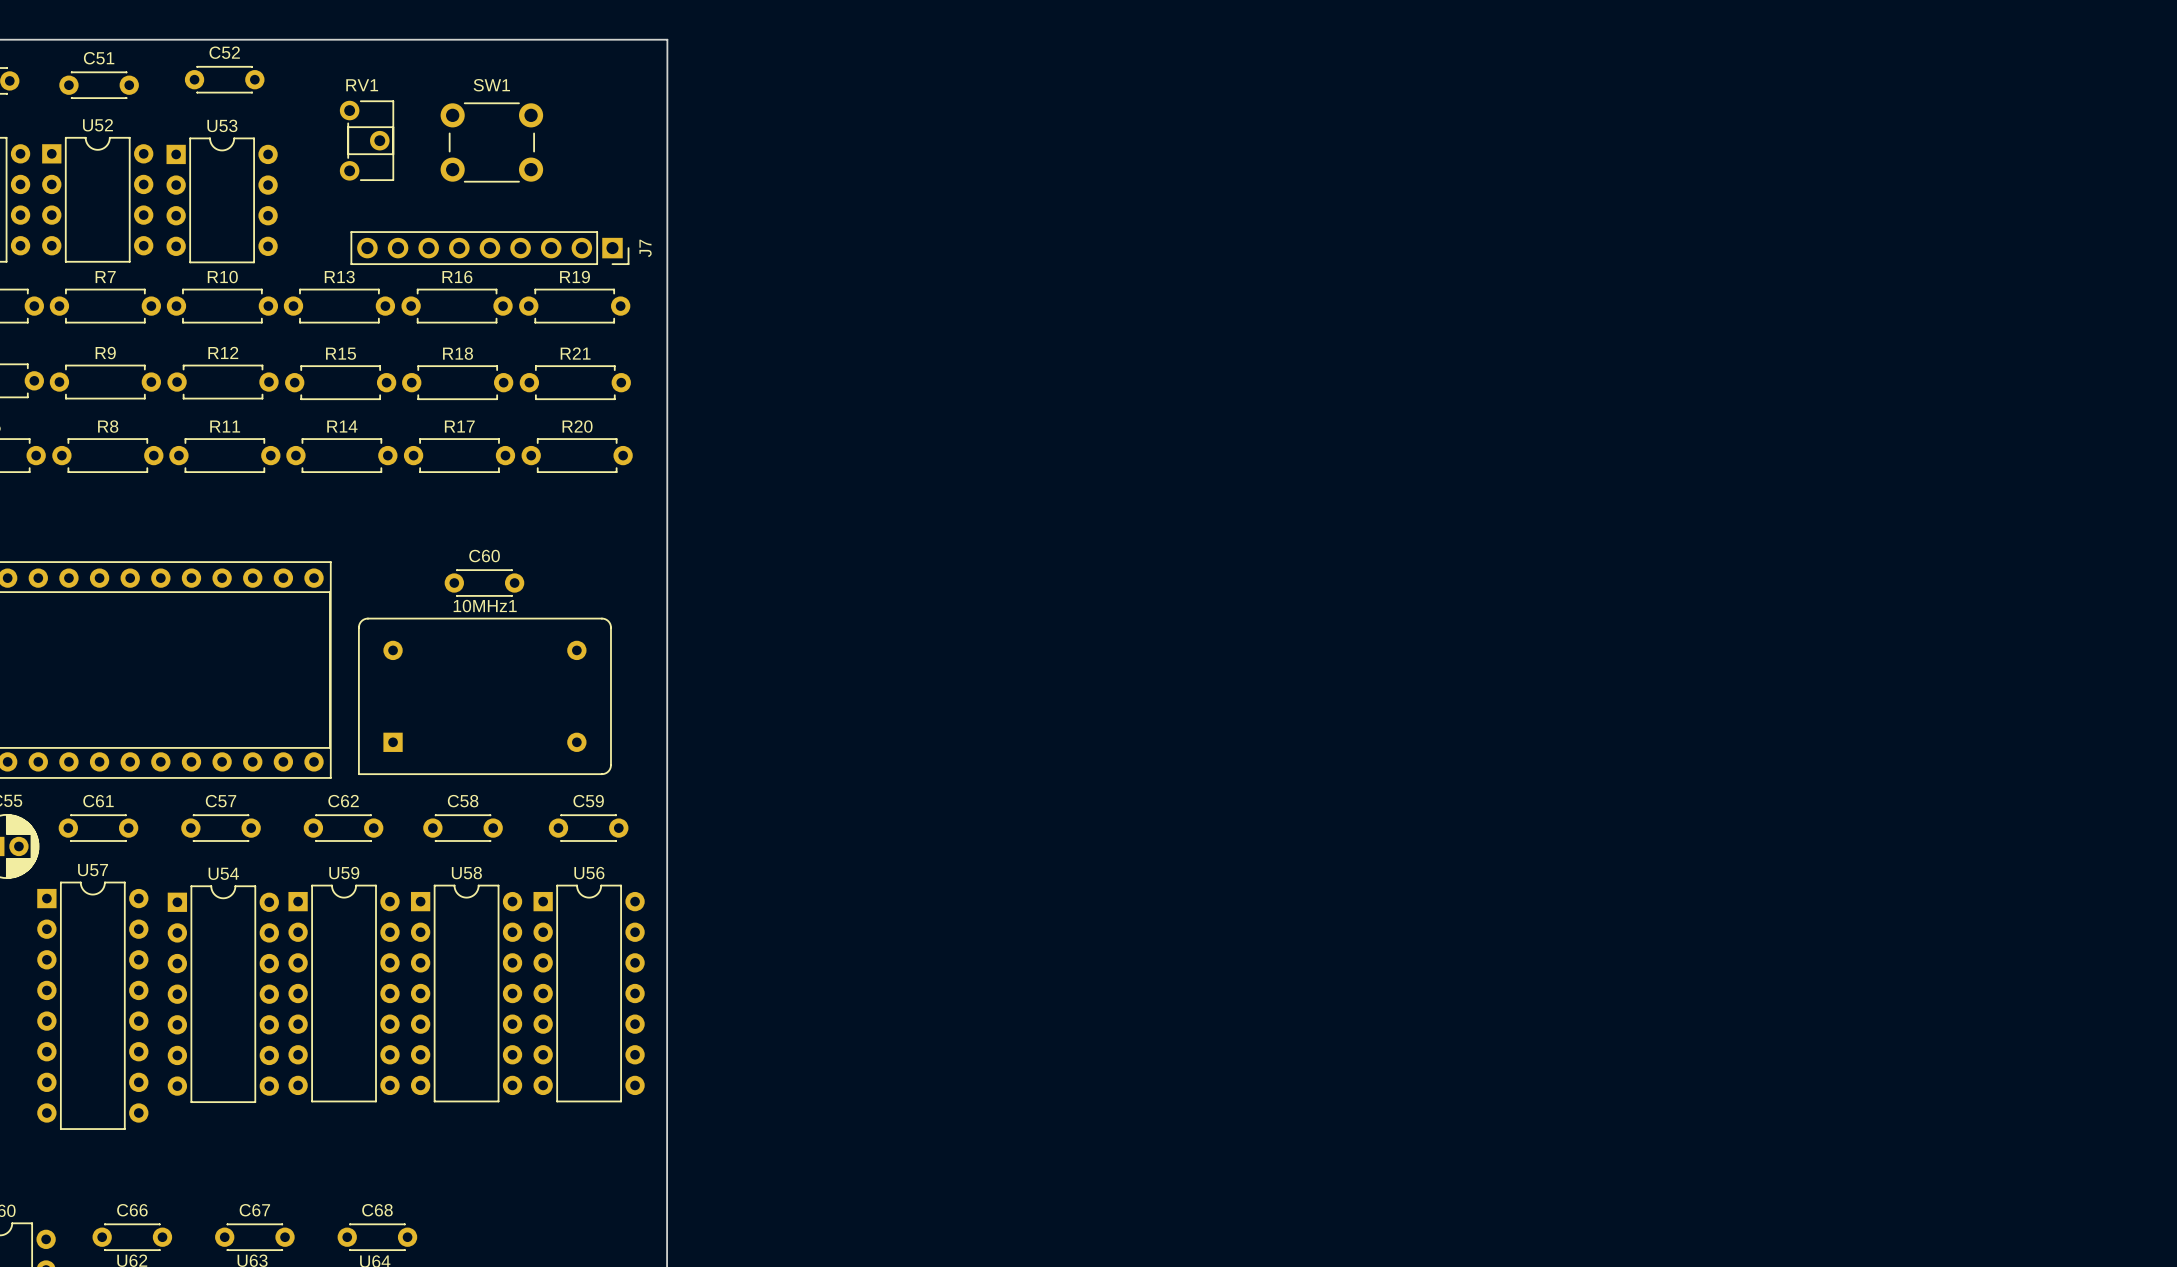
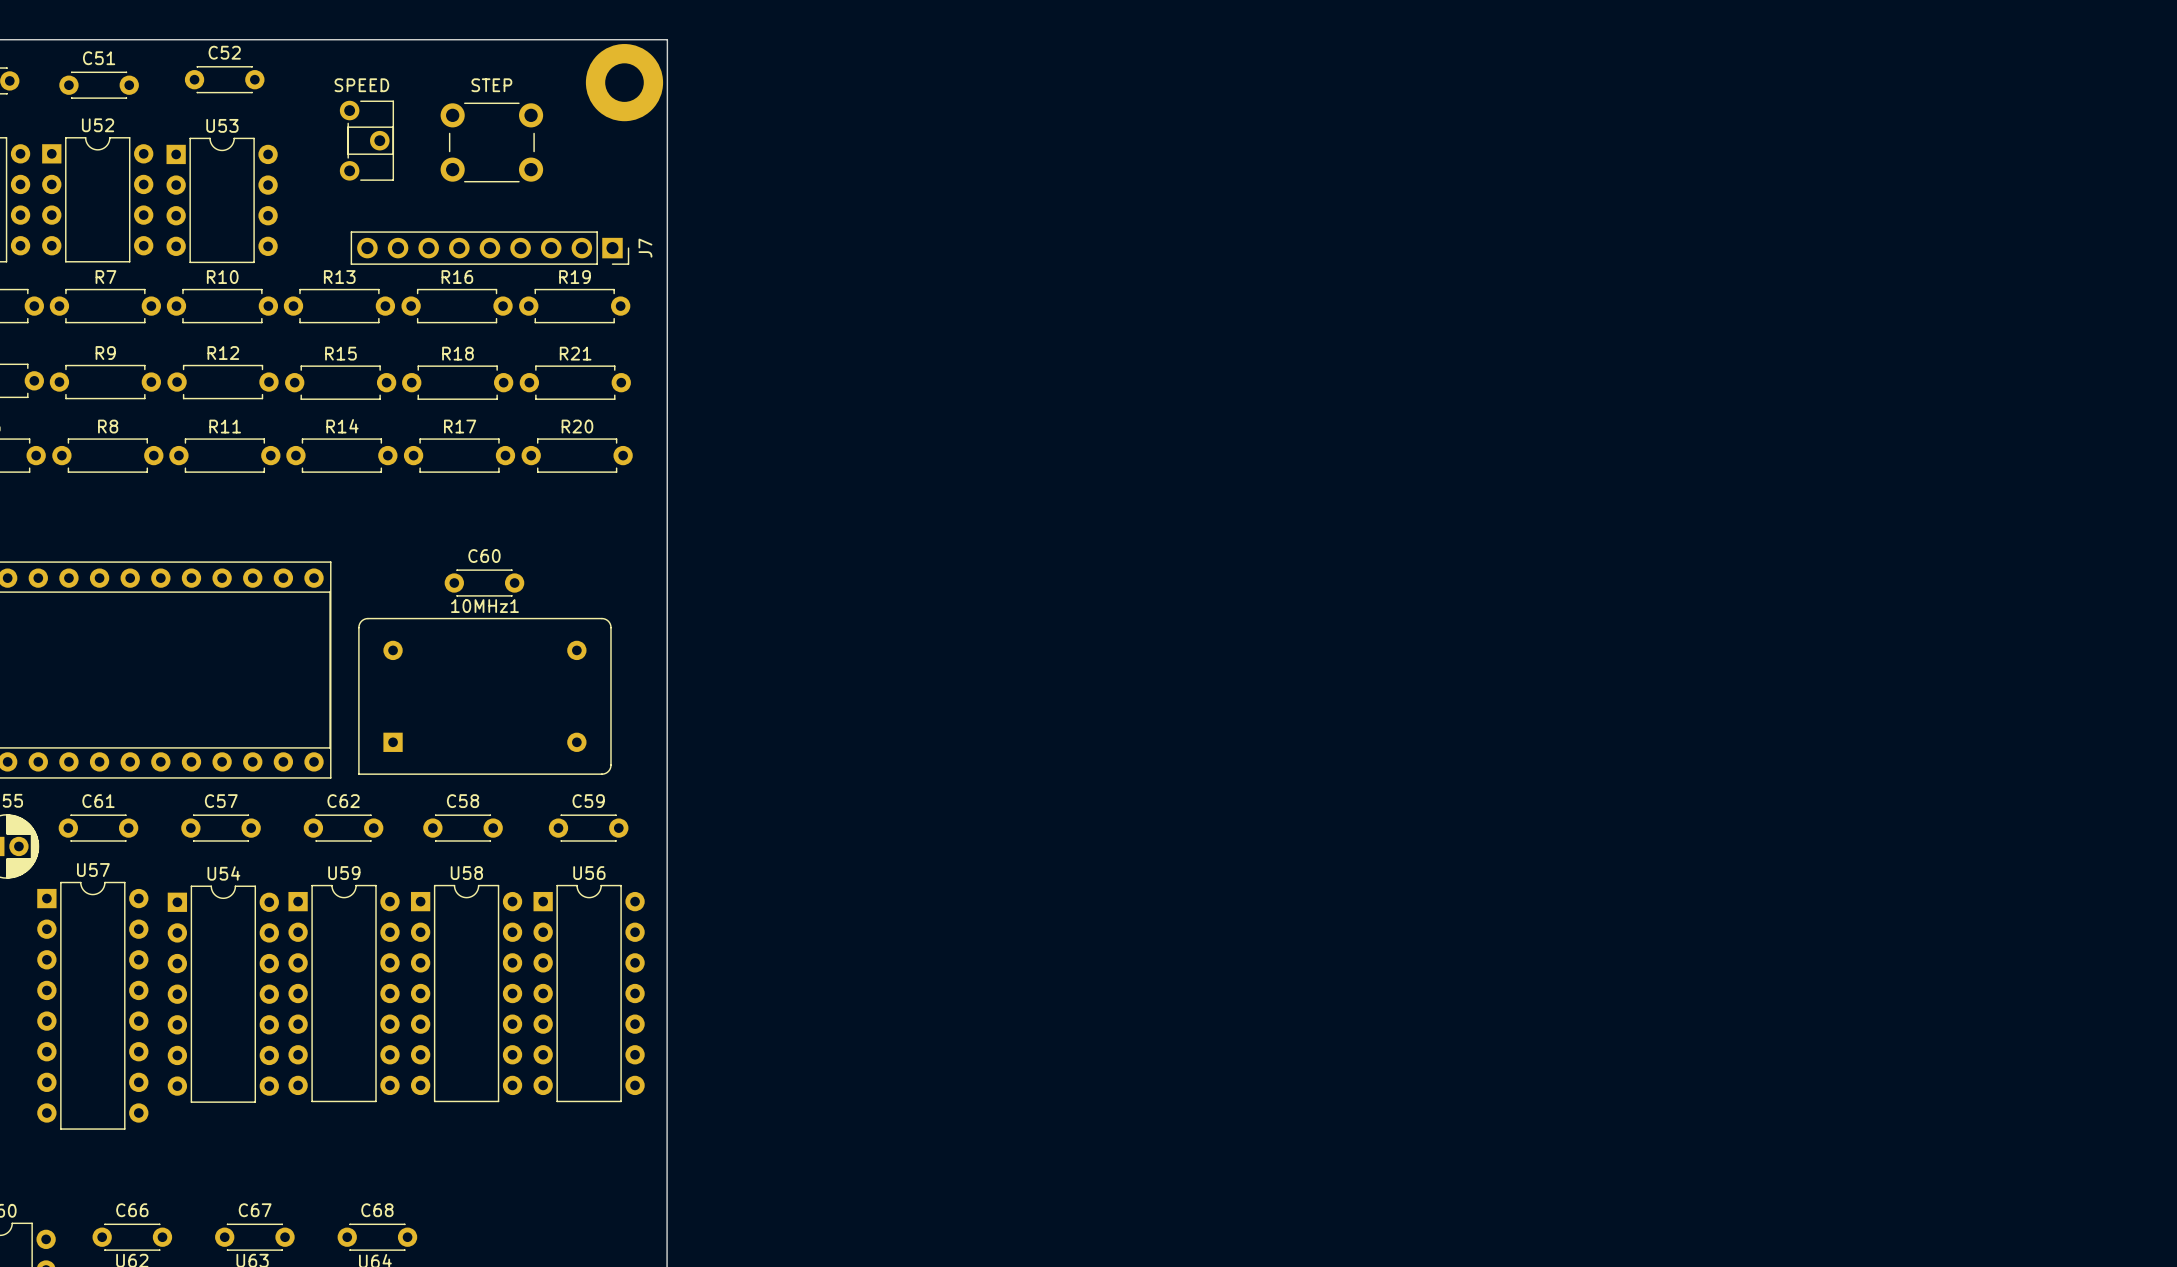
part: none -> (624, 82)
RV1 name: RV1 (362, 85) -> SPEED (361, 85)
SW1 name: SW1 (491, 85) -> STEP (491, 85)

